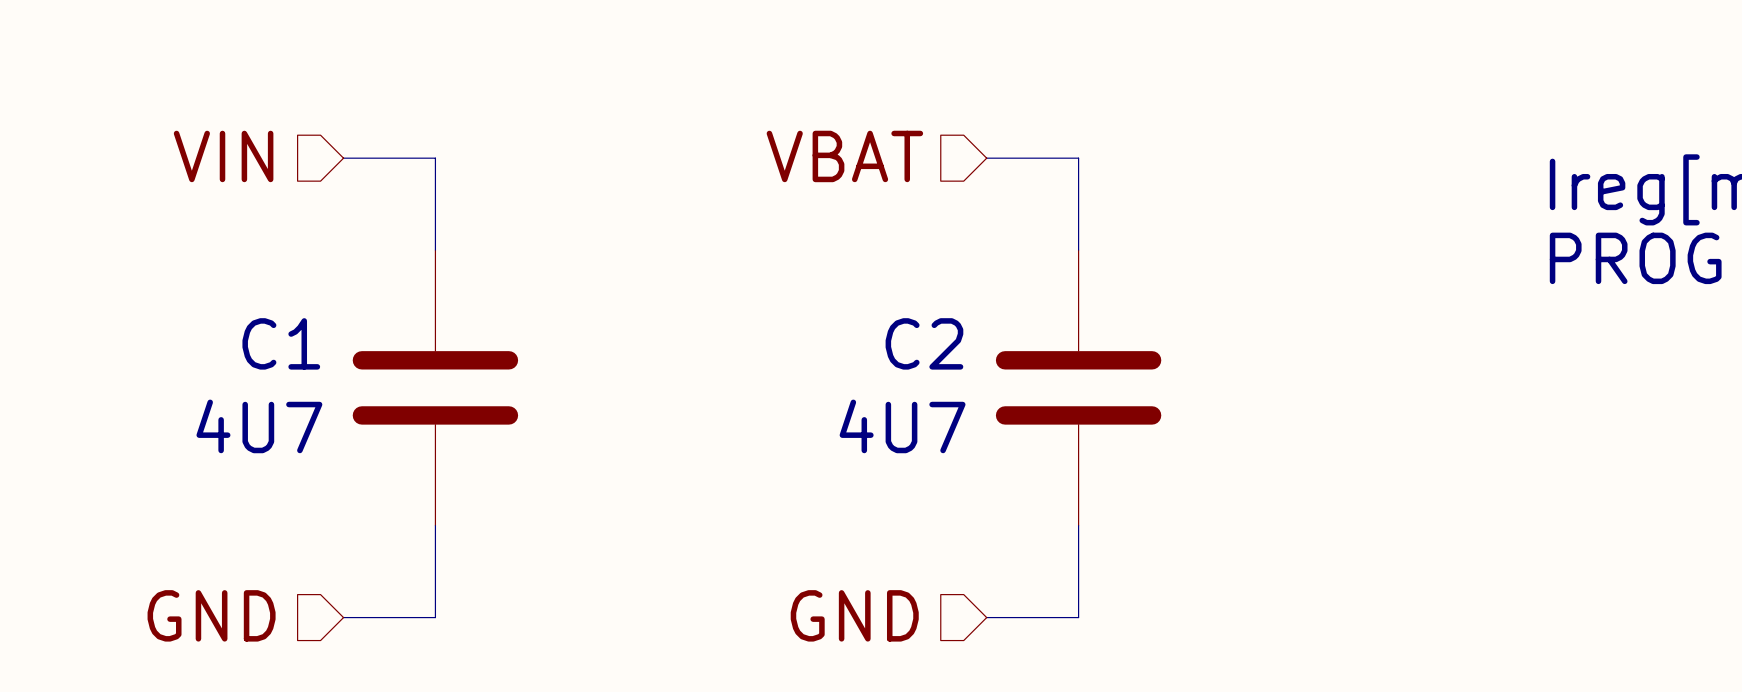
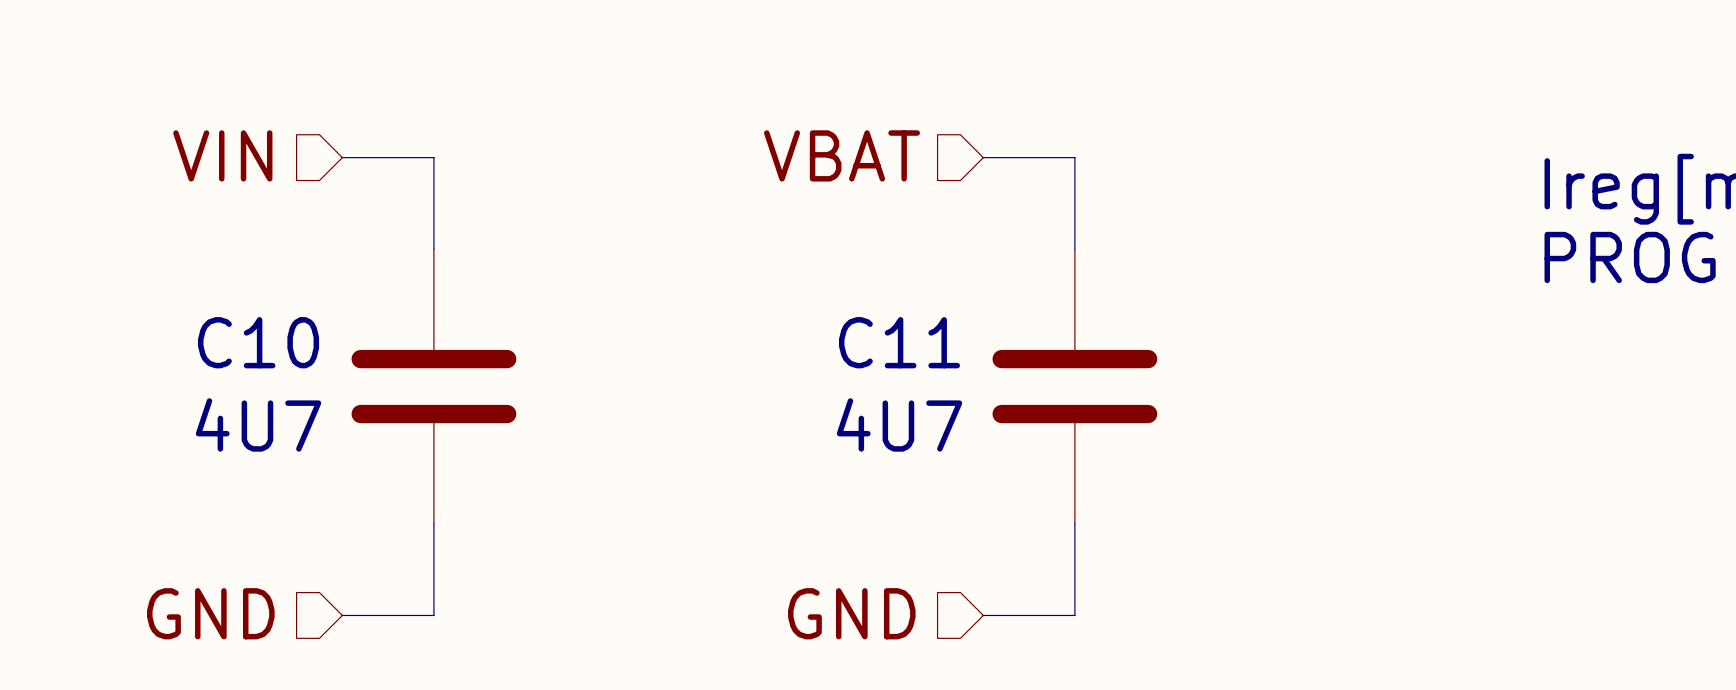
C1 name: C1 (281, 343) -> C10 (258, 342)
C2 name: C2 (924, 343) -> C11 (899, 342)

